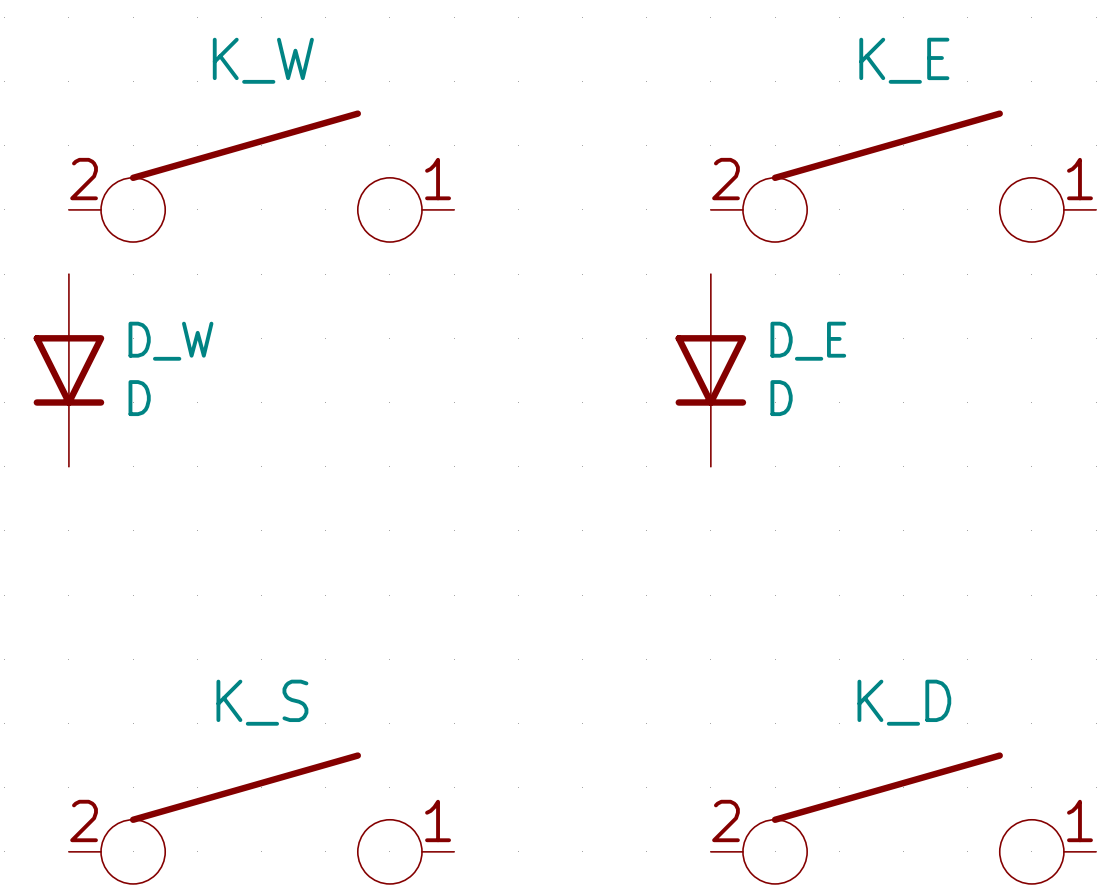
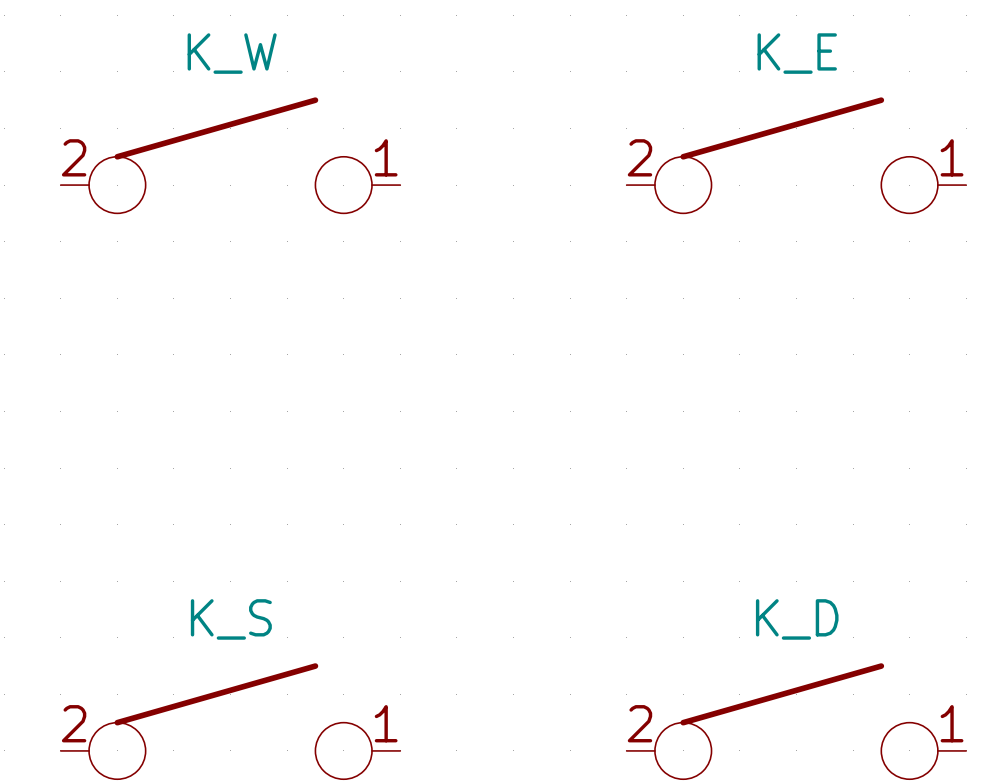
D_W: D (68, 370) -> none
D_E: D (710, 370) -> none

